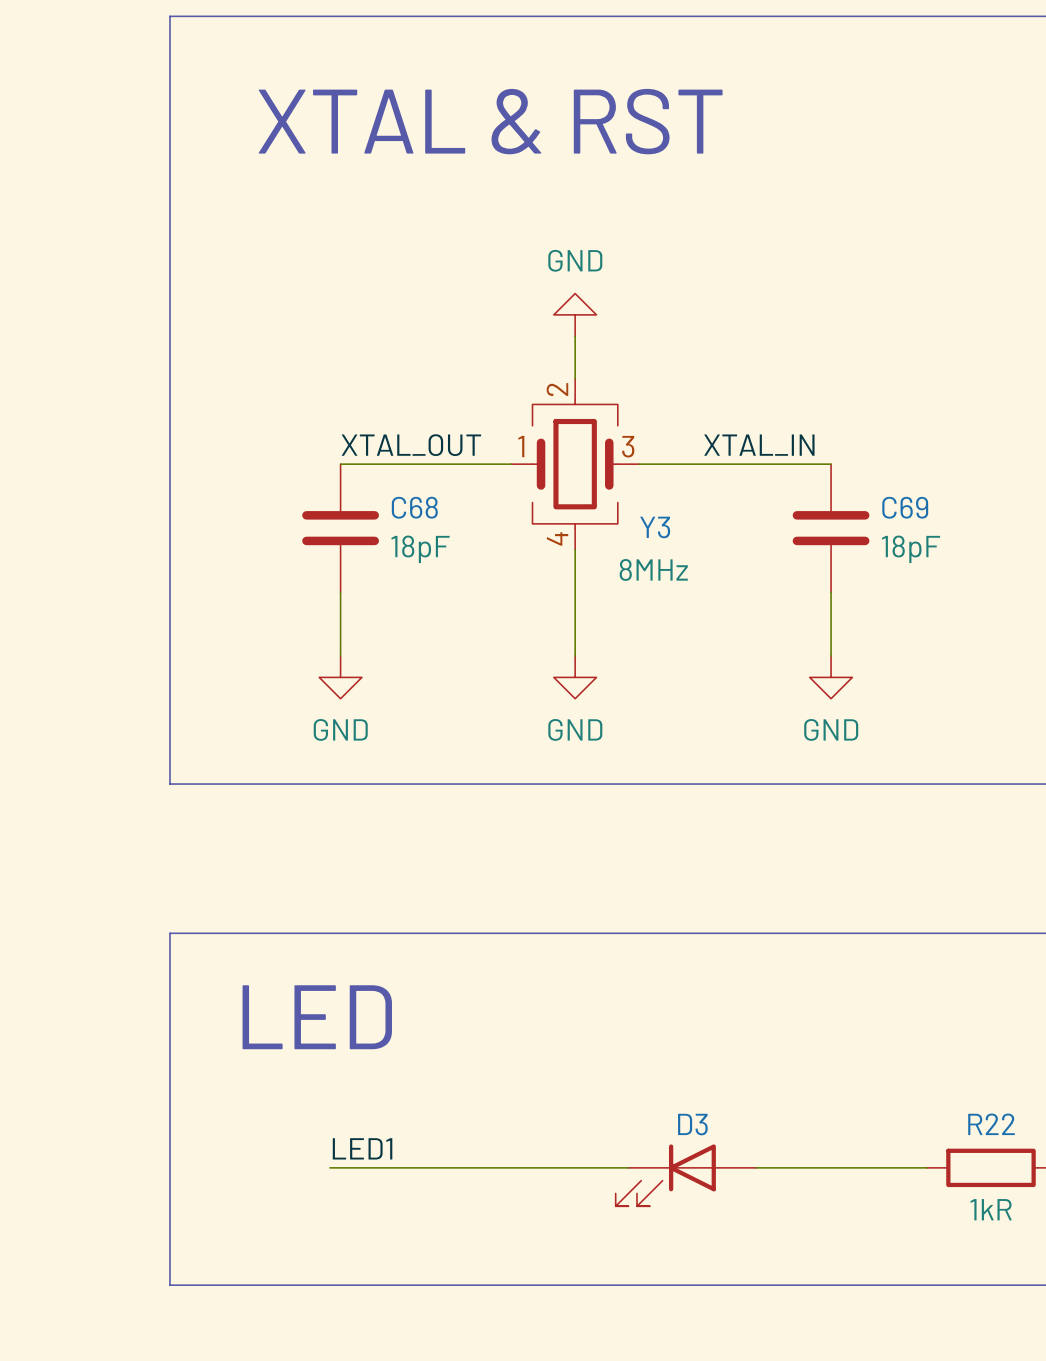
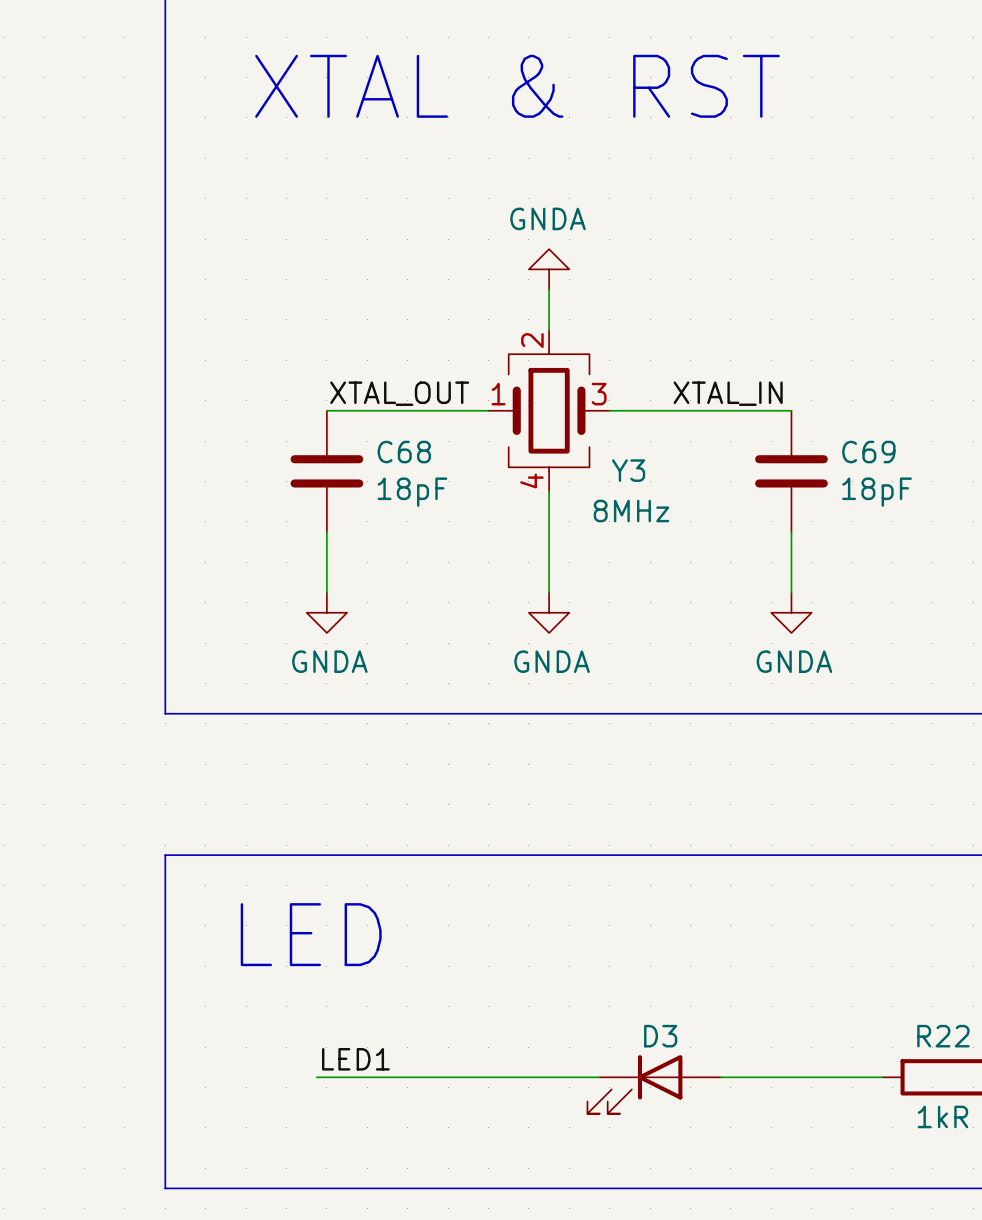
power symbol: GND (575, 314) -> GNDA (549, 269)
power symbol: GND (340, 677) -> GNDA (326, 612)
power symbol: GND (575, 677) -> GNDA (549, 612)
power symbol: GND (831, 677) -> GNDA (791, 612)

